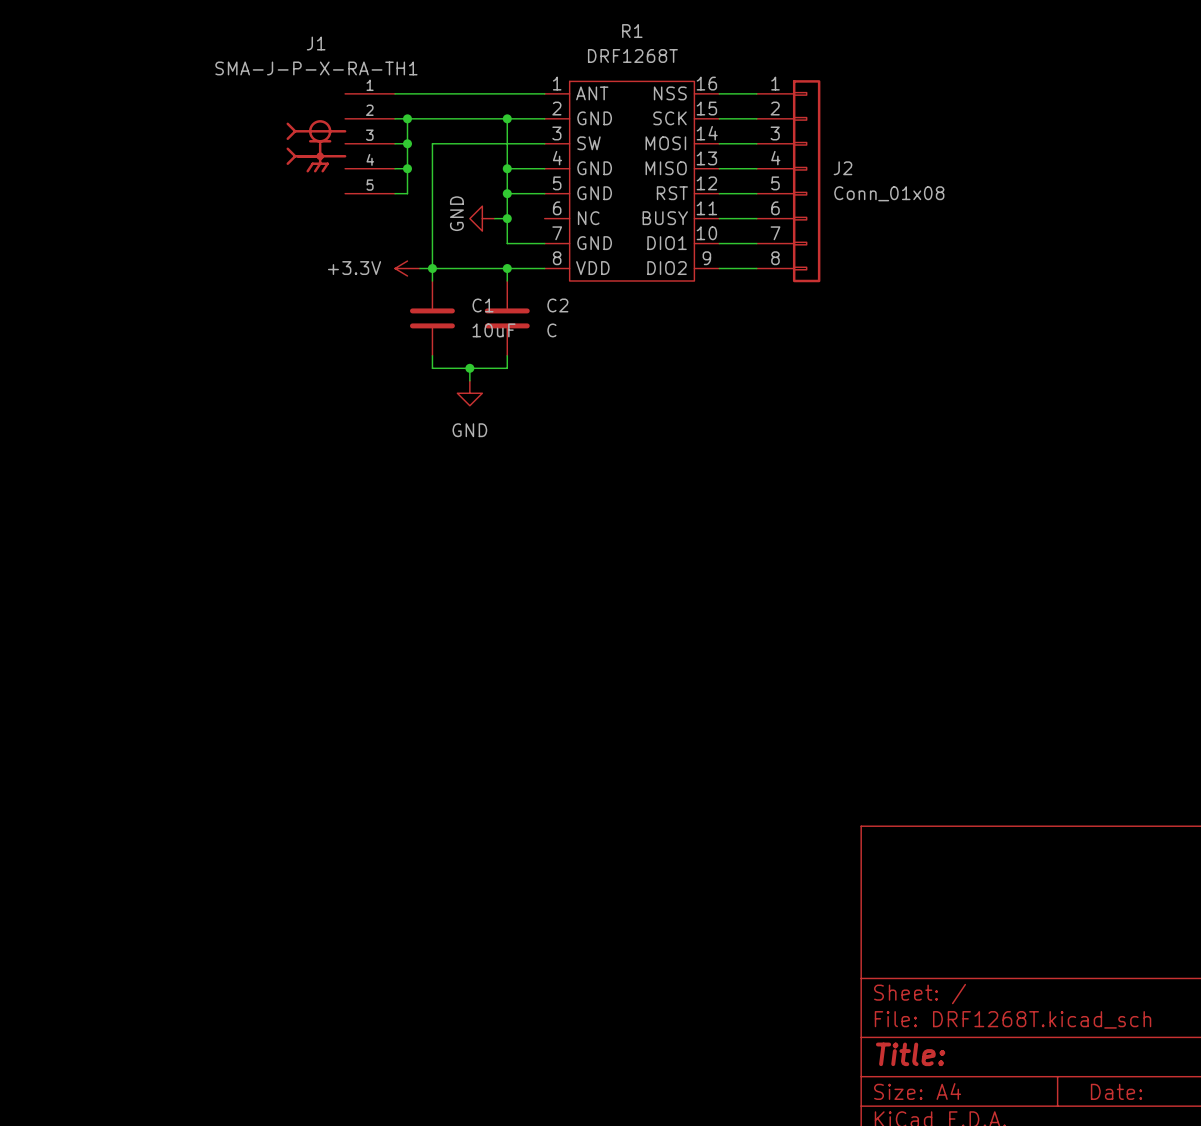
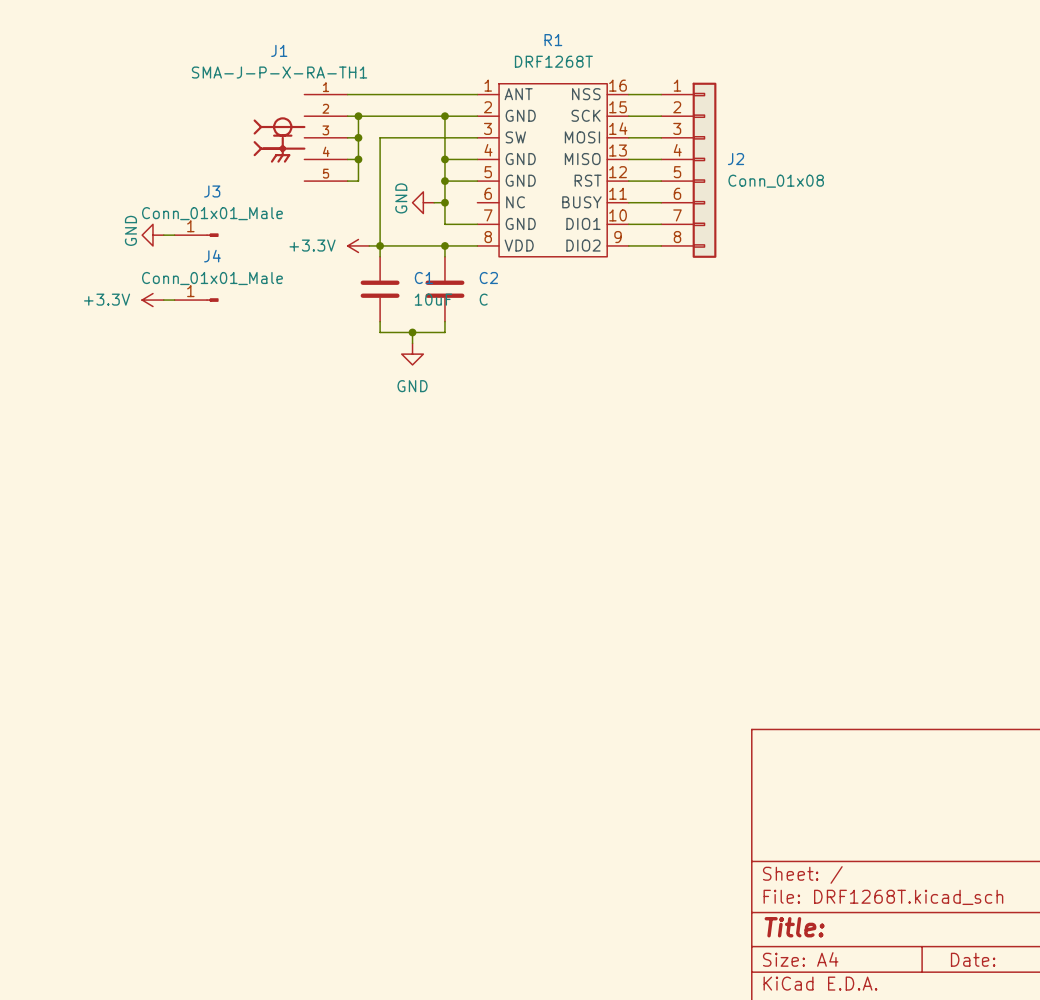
power symbol: none -> GND (152, 235)
wire: none -> (163, 235) (174, 235)
J3: none -> Conn_01x01_Male (196, 235)
power symbol: none -> +3.3V (152, 300)
wire: none -> (163, 300) (174, 300)
J4: none -> Conn_01x01_Male (196, 300)

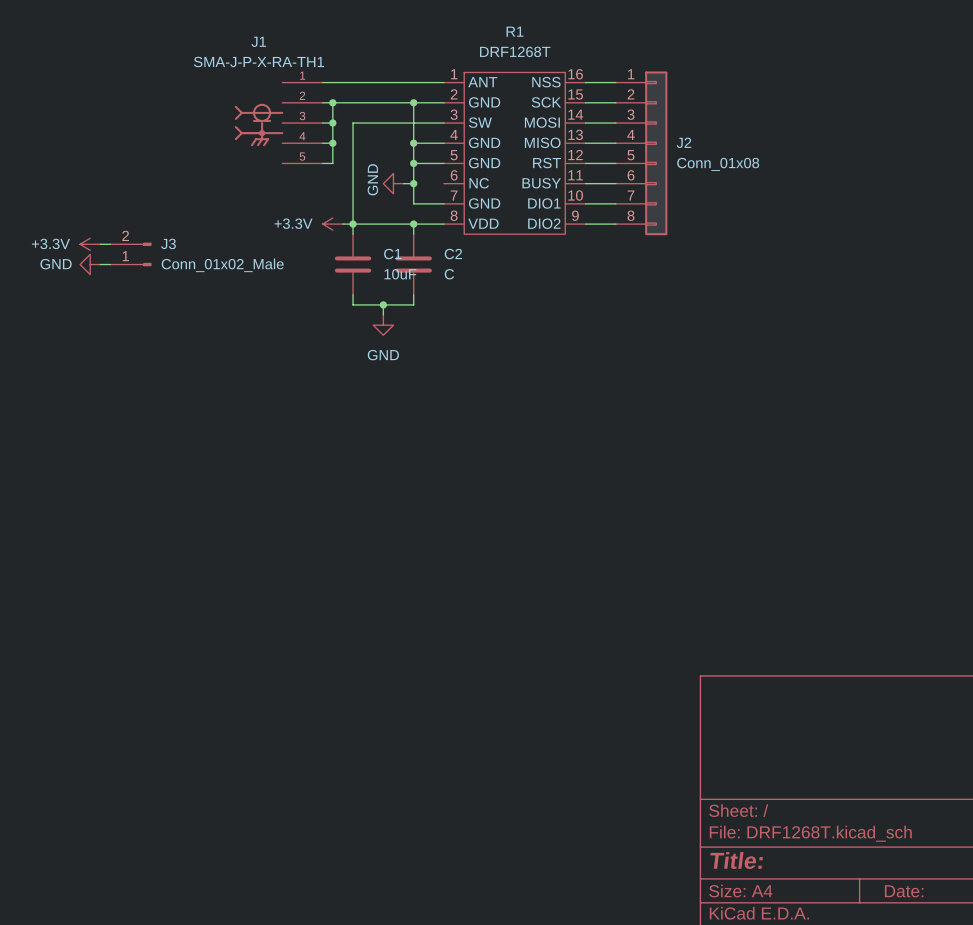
J3 name position: J3 (212, 191) -> J3 (168, 243)
J3 value: Conn_01x01_Male (212, 213) -> Conn_01x02_Male (222, 265)
power symbol text rotation: 0° (130, 230) -> 90° clockwise (56, 264)
J3 symbol: [174, 233, 219, 237] -> [110, 242, 152, 267]
power symbol position: GND (152, 235) -> GND (90, 264)
wire: (163, 235) (174, 235) -> (100, 244) (110, 244)
power symbol position: +3.3V (152, 300) -> +3.3V (90, 244)
wire: (163, 300) (174, 300) -> (100, 264) (110, 264)
J4: Conn_01x01_Male (196, 300) -> none

